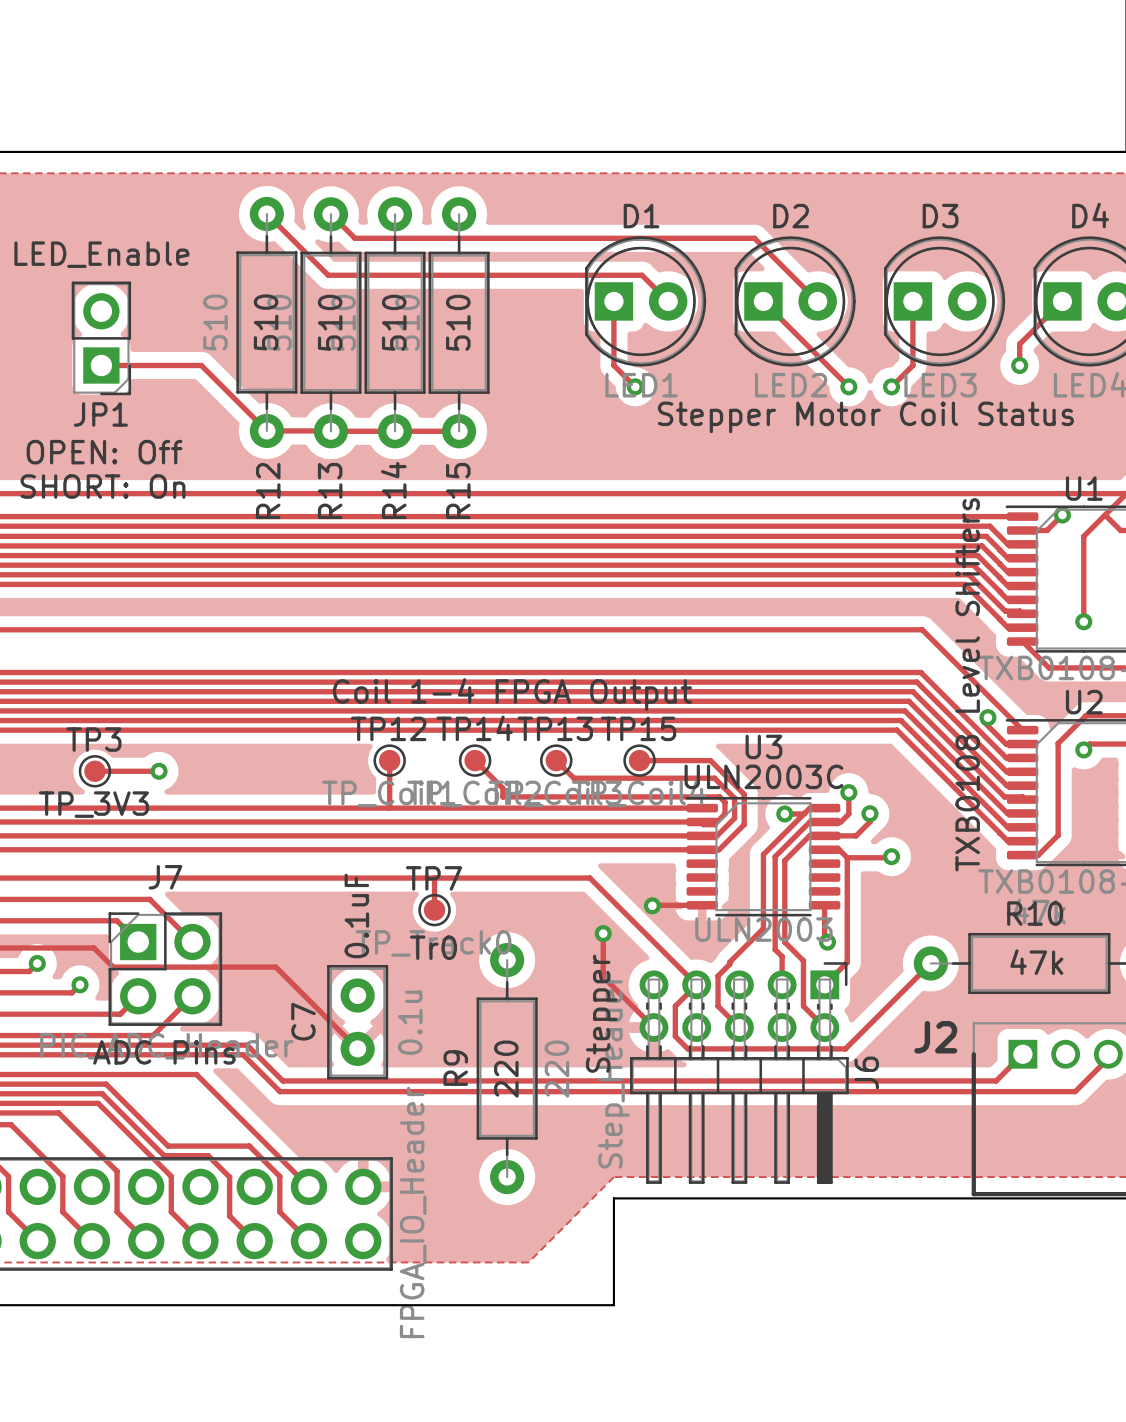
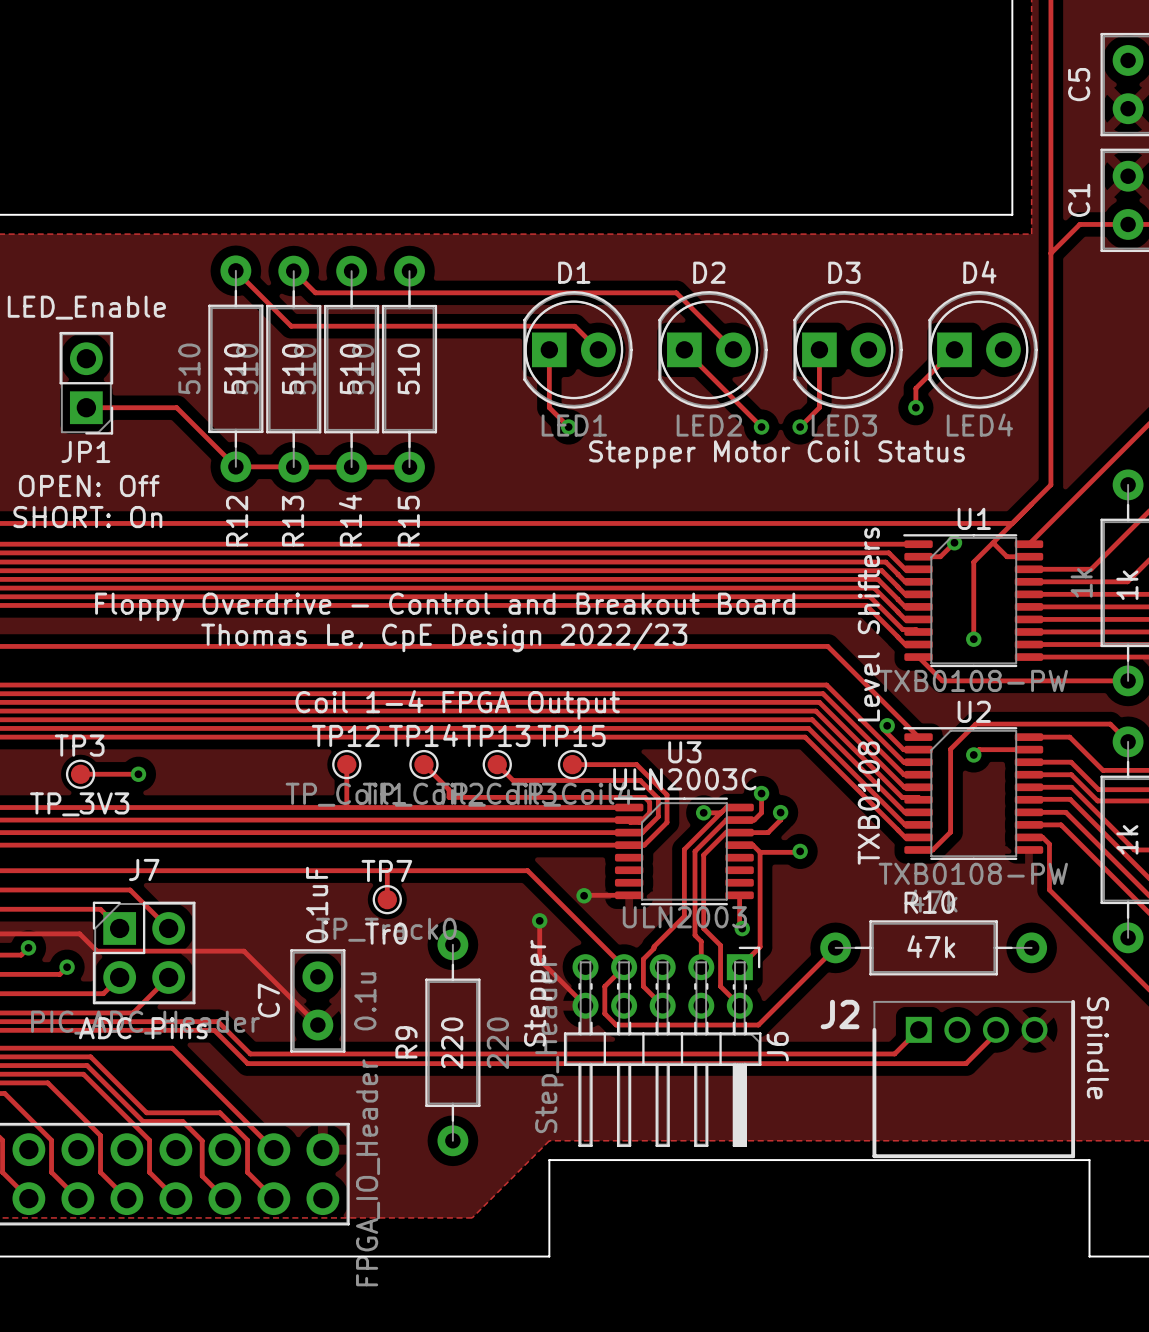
text: none -> Floppy Overdrive - Control and Breakout Board (445, 606)
text: none -> Thomas Le, CpE Design 2022/23 (444, 637)

